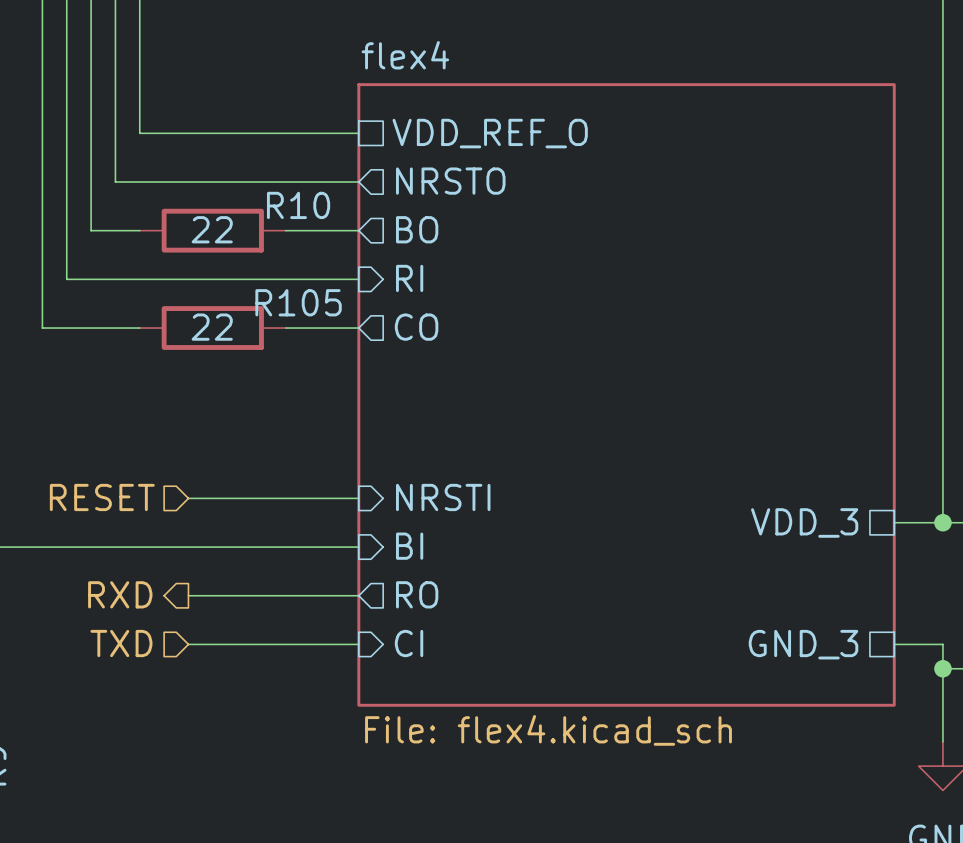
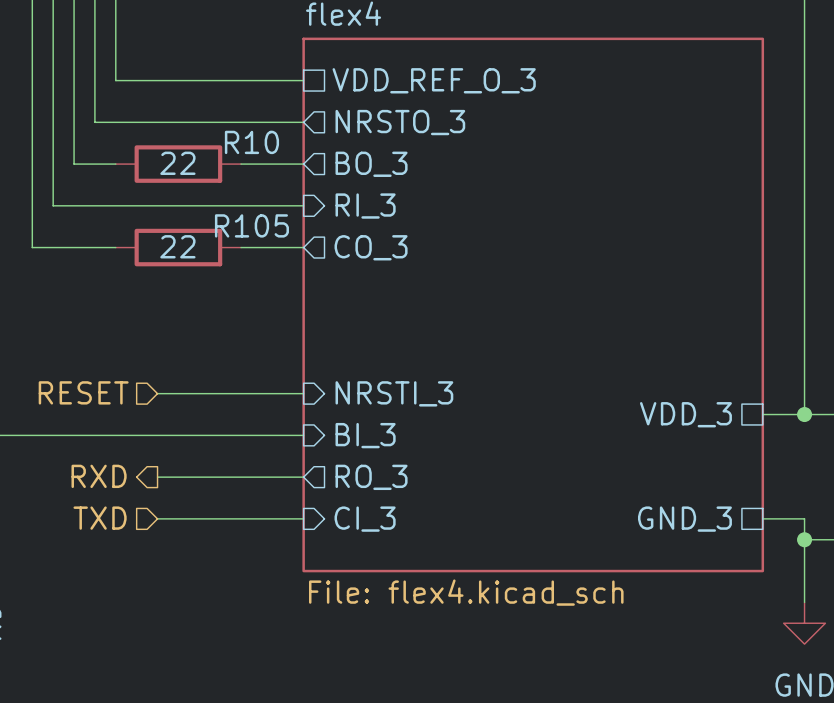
sheet pin: VDD_REF_O (490, 133) -> VDD_REF_O_3 (434, 80)
sheet pin: NRSTO (450, 181) -> NRSTO_3 (400, 122)
sheet pin: BO (417, 229) -> BO_3 (371, 164)
sheet pin: RI (409, 278) -> RI_3 (365, 206)
sheet pin: CO (416, 327) -> CO_3 (371, 247)
sheet pin: NRSTI (443, 497) -> NRSTI_3 (394, 393)
sheet pin: BI (409, 546) -> BI_3 (365, 435)
sheet pin: RO (417, 594) -> RO_3 (371, 477)
sheet pin: CI (409, 643) -> CI_3 (365, 519)

